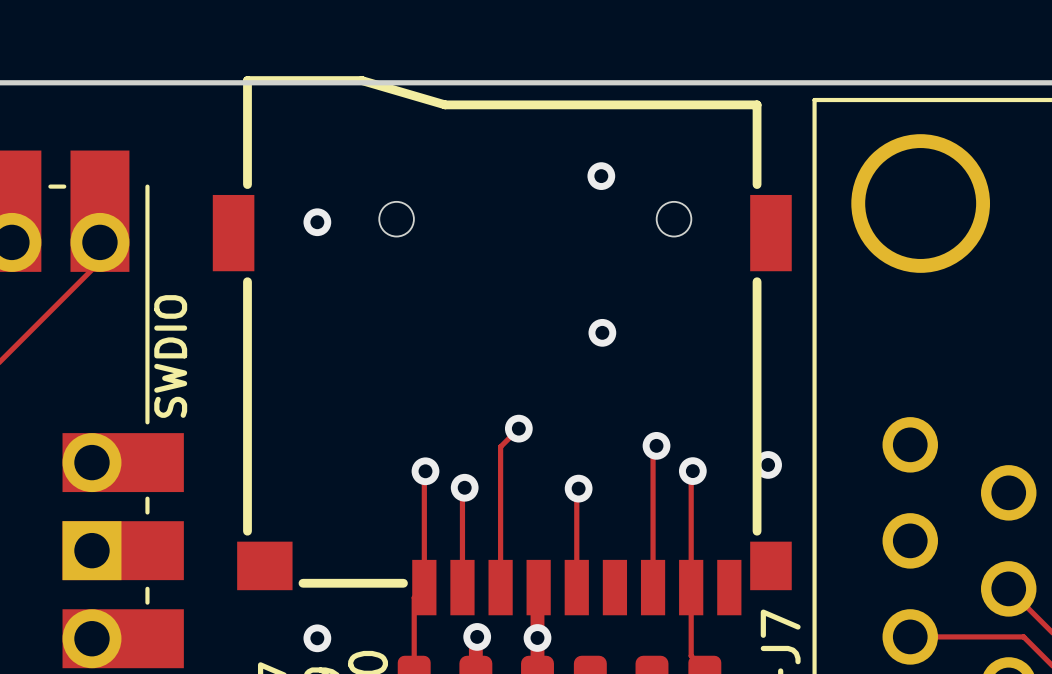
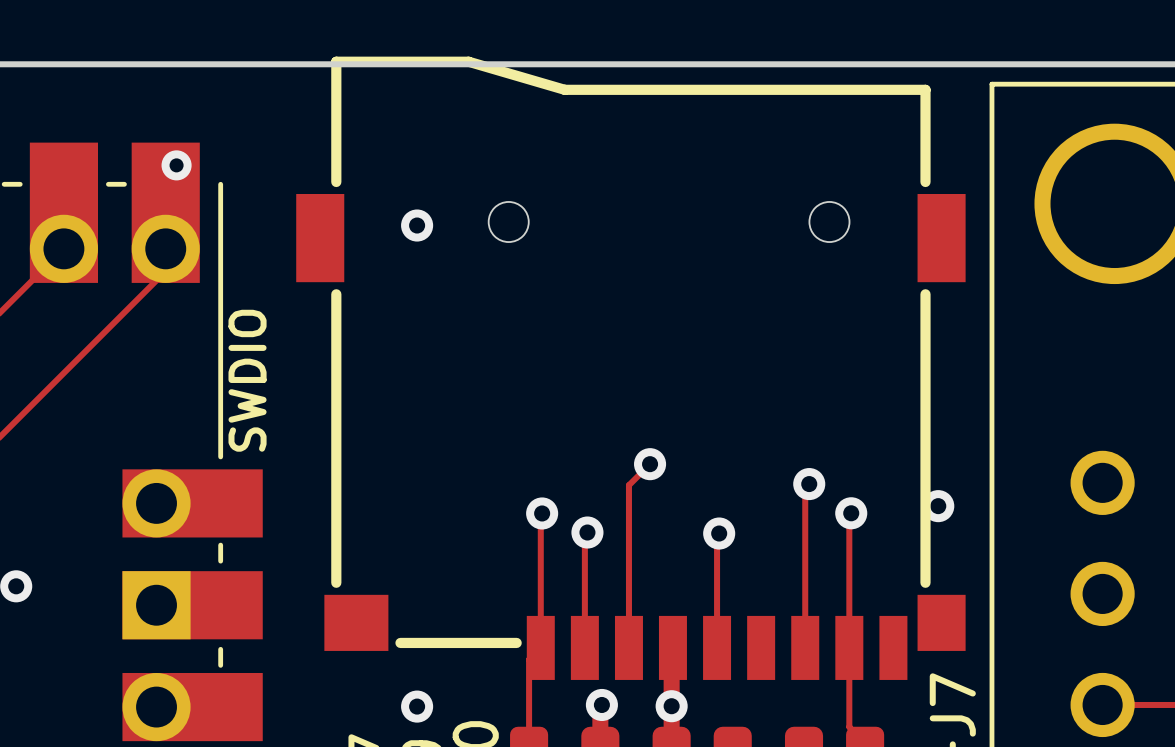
via: none -> (176, 165)
via: (601, 176) -> none
via: (602, 332) -> none

